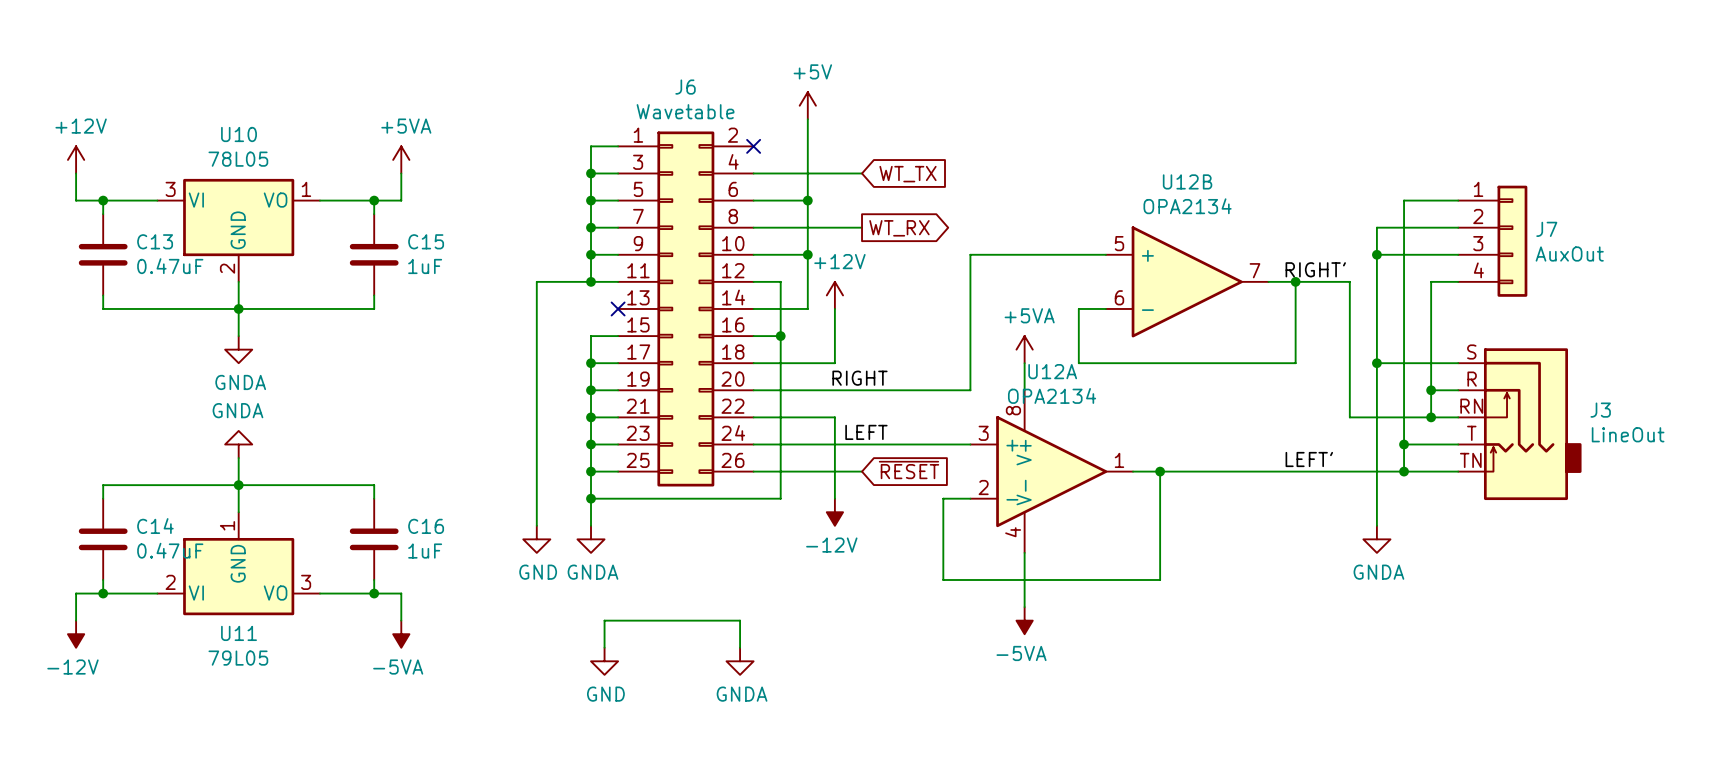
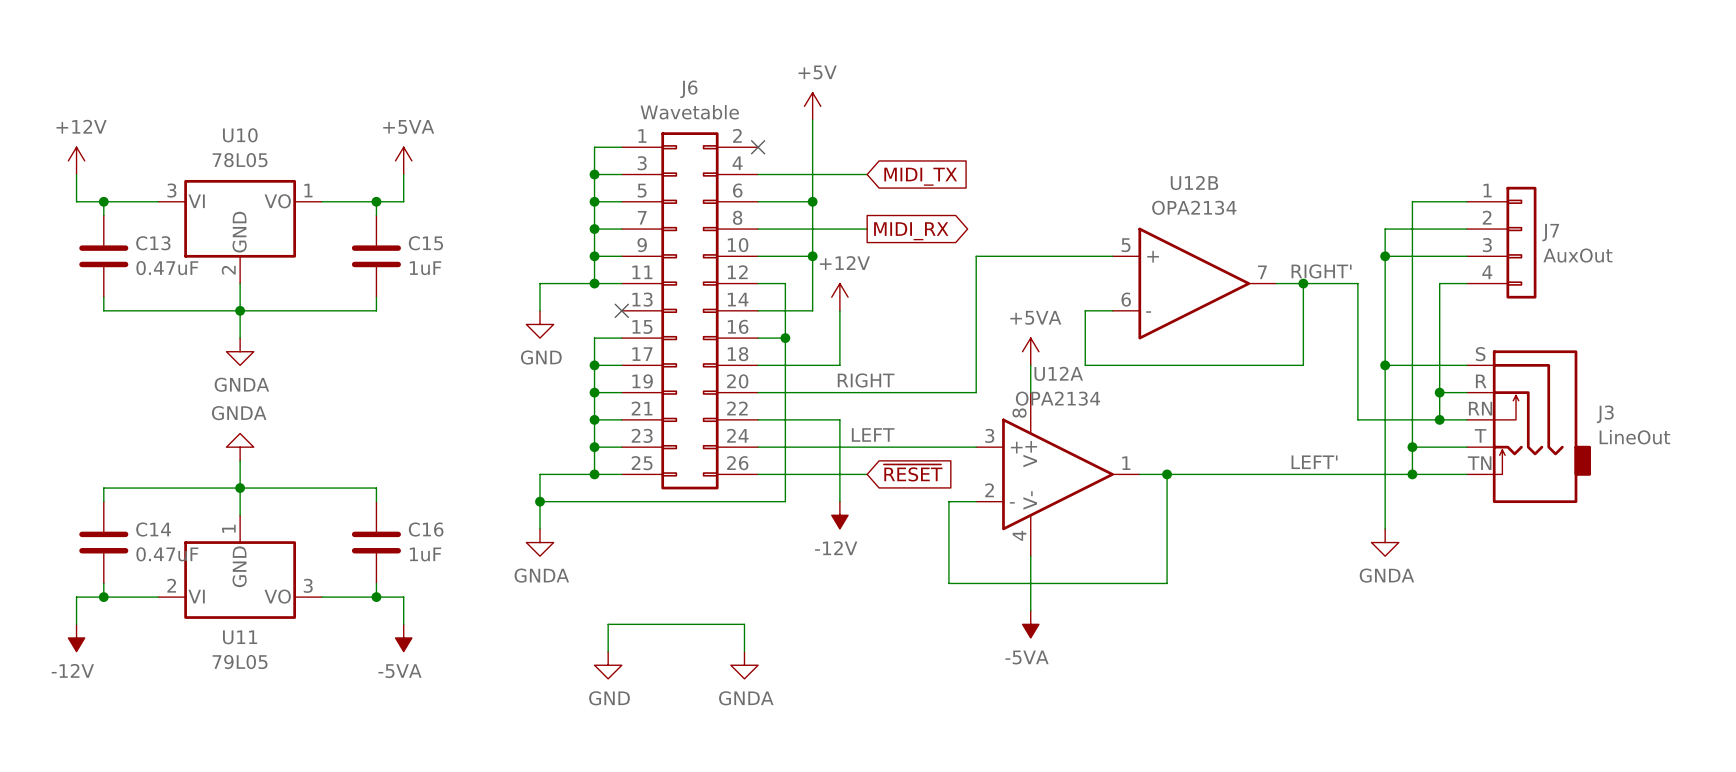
global label: WT_TX (908, 174) -> MIDI_TX (920, 176)
global label: WT_RX (899, 228) -> MIDI_RX (911, 231)
wire: (536, 308) (536, 471) -> none
power symbol: none -> GND (540, 324)
wire: (591, 471) (591, 525) -> (594, 474) (540, 474)
wire: none -> (540, 501) (594, 501)
junction position: (591, 498) -> (540, 501)
power symbol: GND (536, 539) -> GNDA (540, 542)
power symbol: GNDA (591, 539) -> none

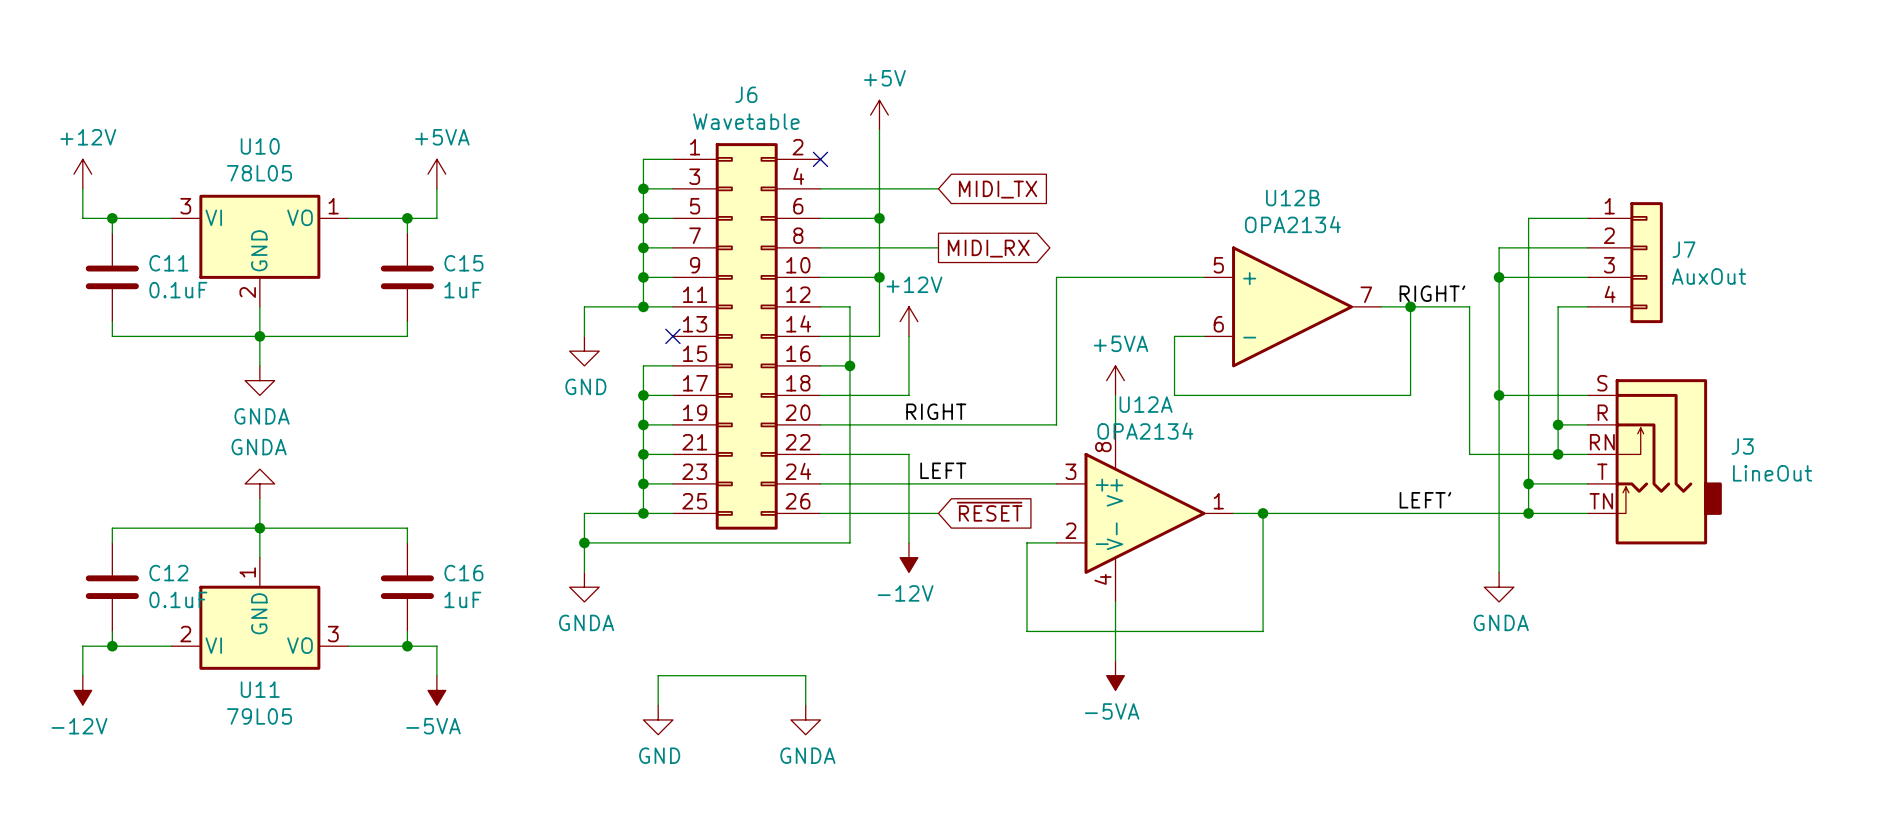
C13 name: C13 (153, 243) -> C11 (168, 263)
C13 value: 0.47uF (167, 268) -> 0.1uF (178, 290)
C14 name: C14 (153, 529) -> C12 (168, 573)
C14 value: 0.47uF (167, 554) -> 0.1uF (178, 599)

